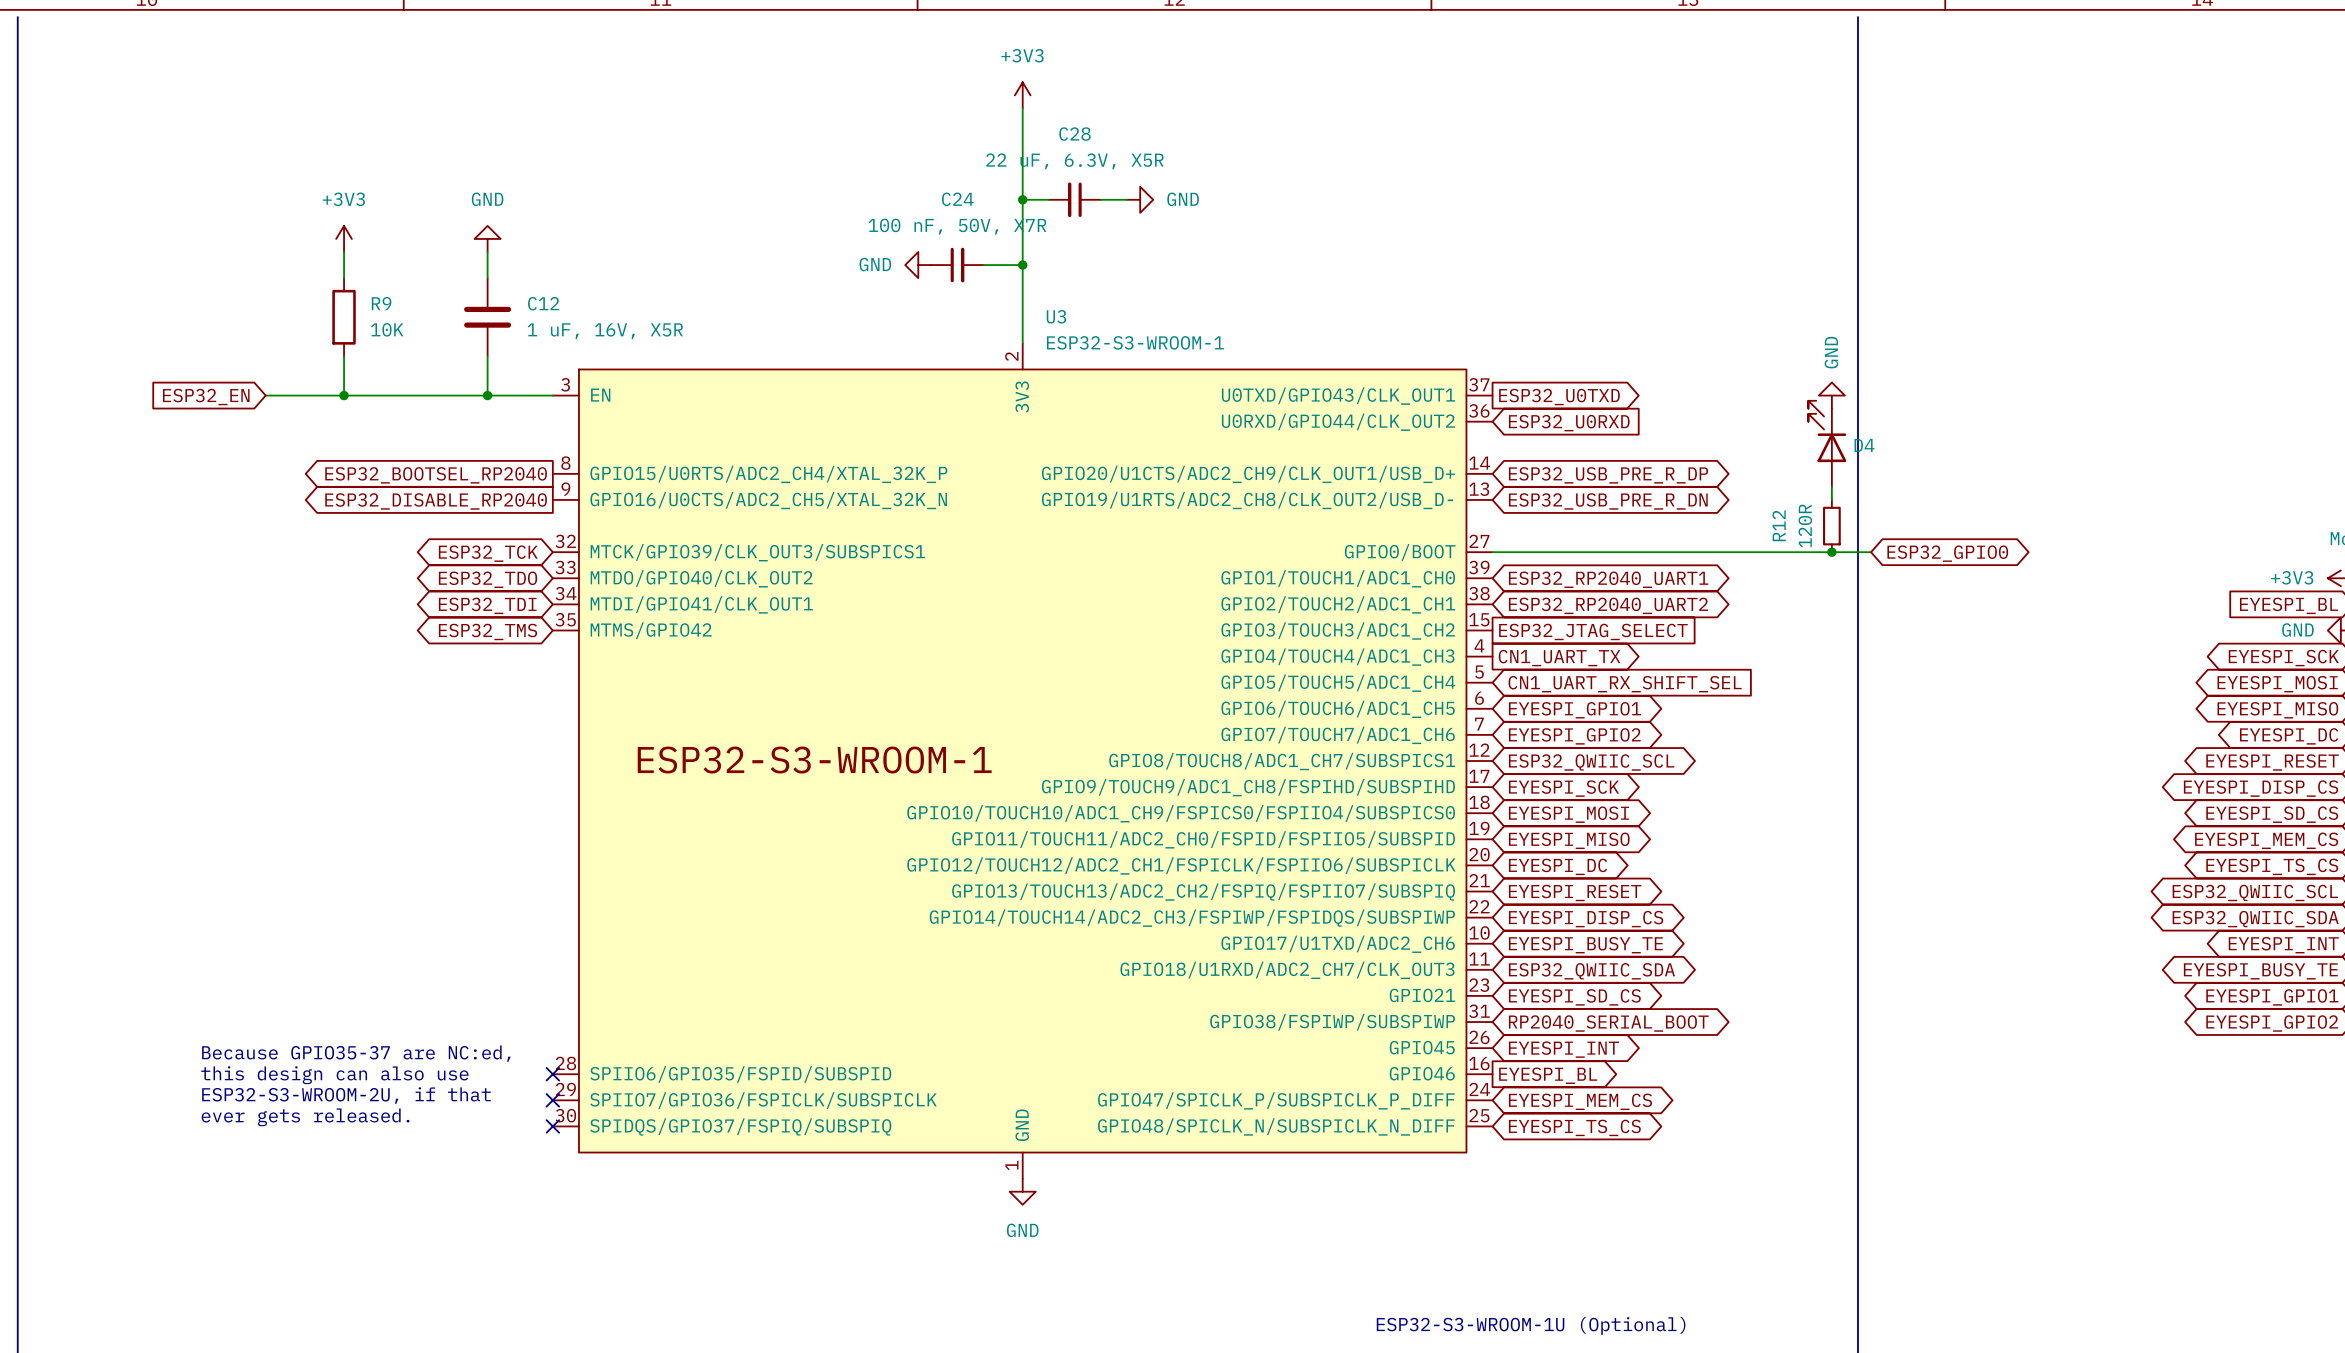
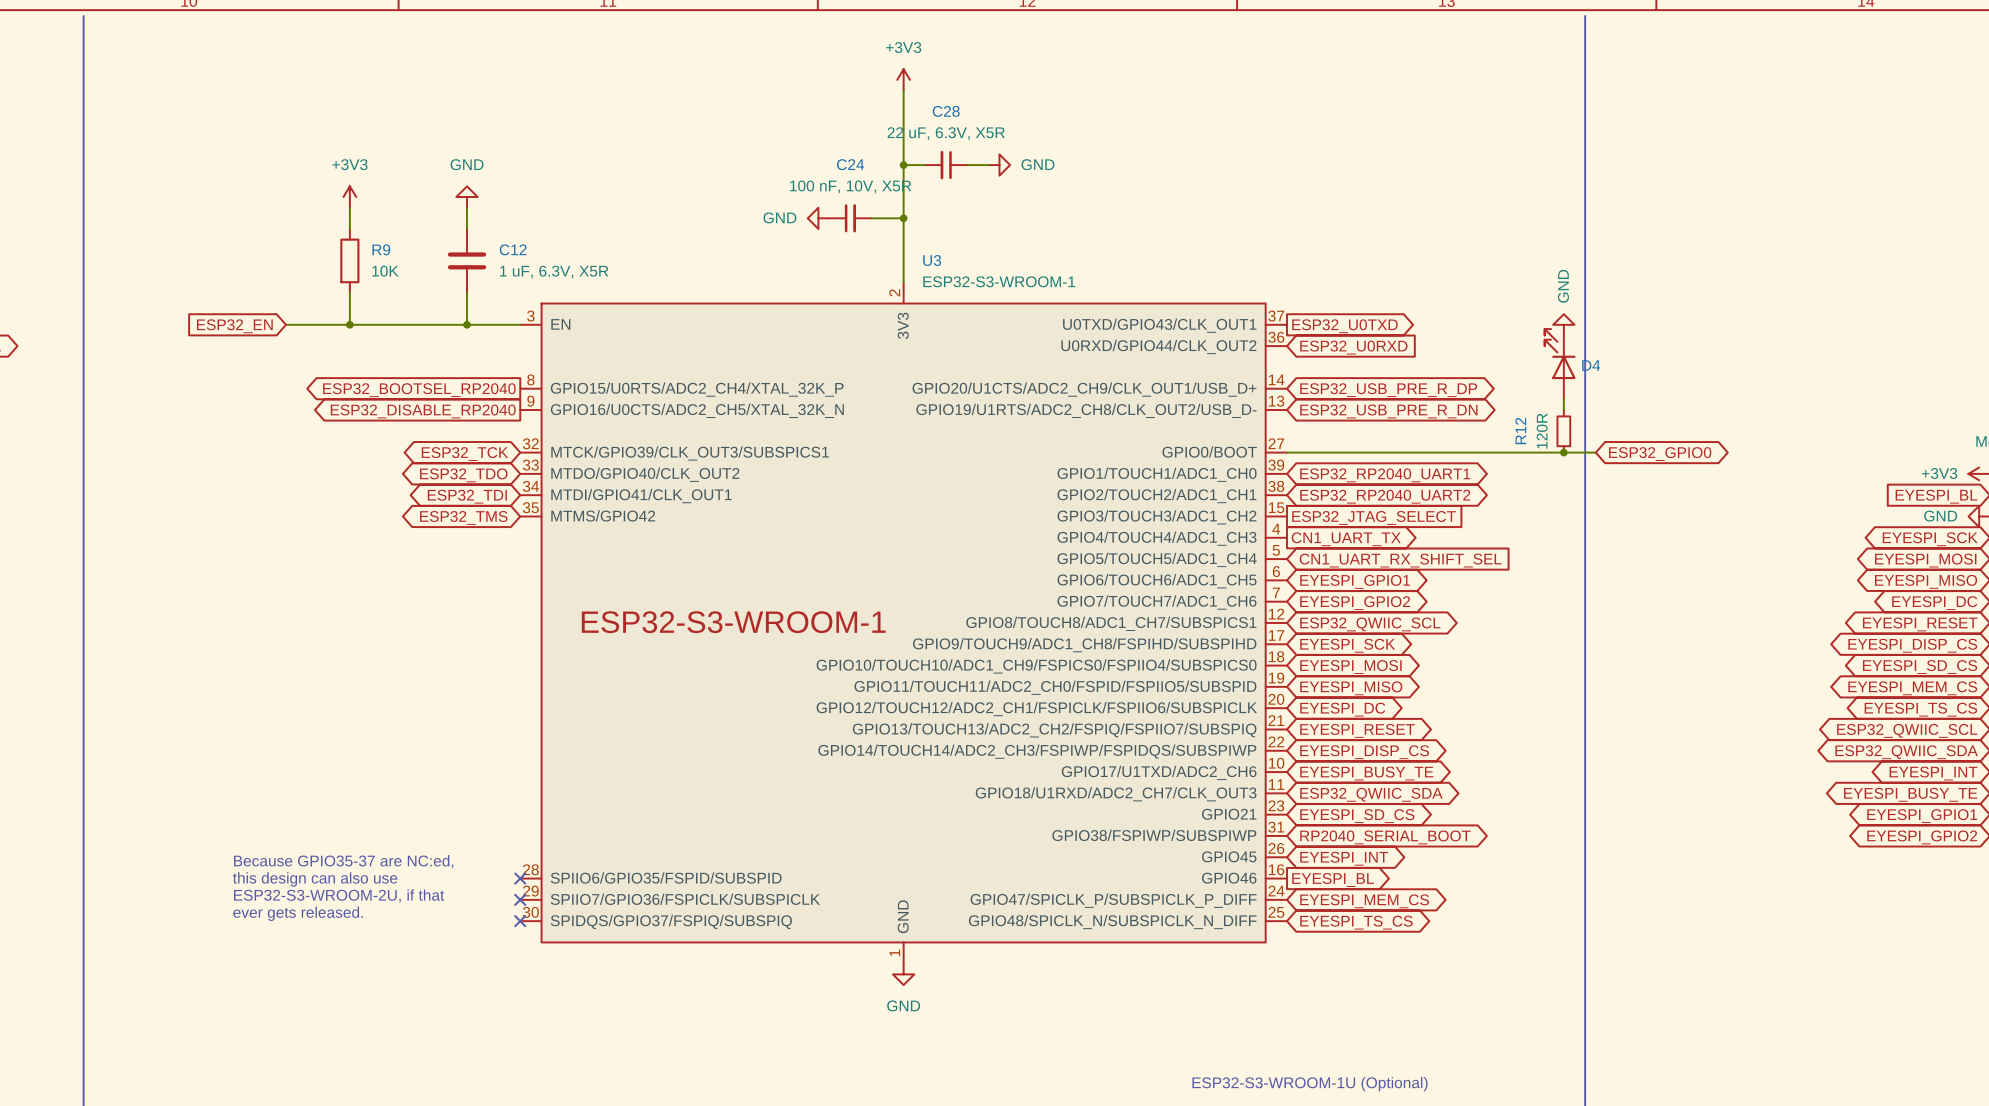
C24 value: 100 nF, 50V, X7R (957, 226) -> 100 nF, 10V, X5R (850, 186)
C12 value: 1 uF, 16V, X5R (605, 331) -> 1 uF, 6.3V, X5R (554, 272)

